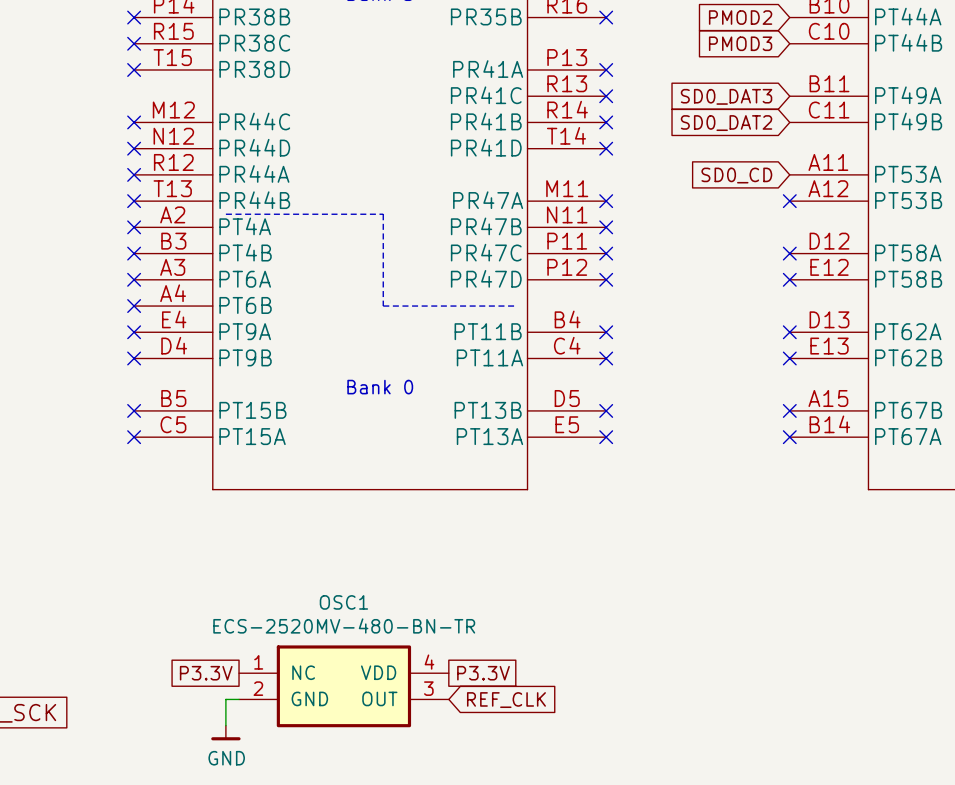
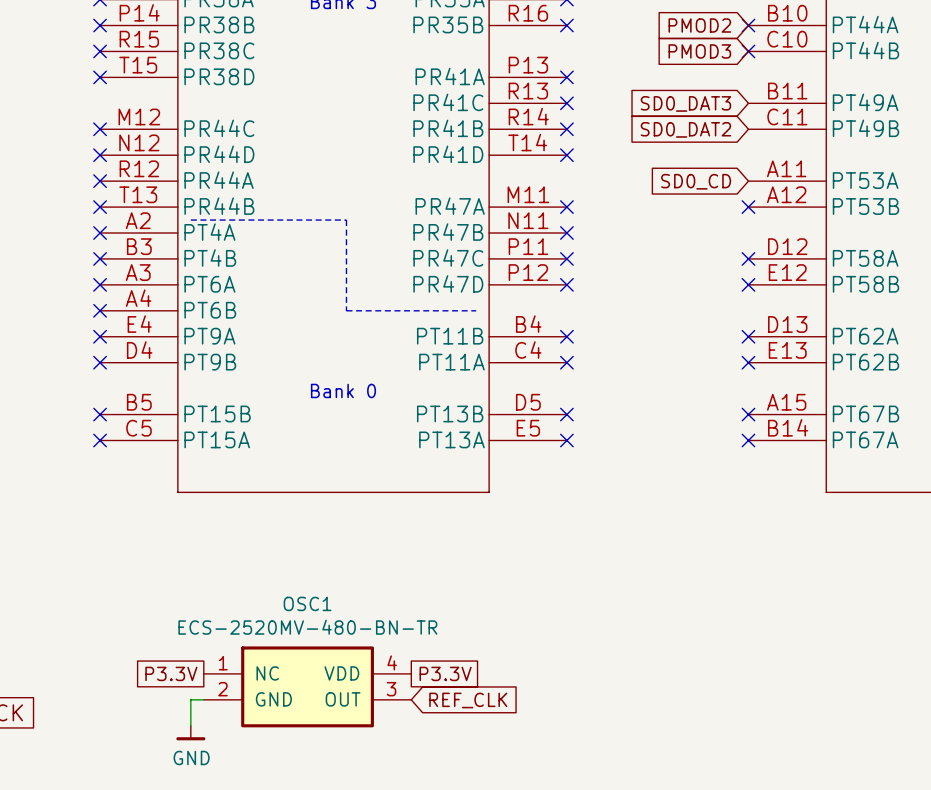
no-connect mark: none -> (748, 25)
no-connect mark: none -> (748, 51)

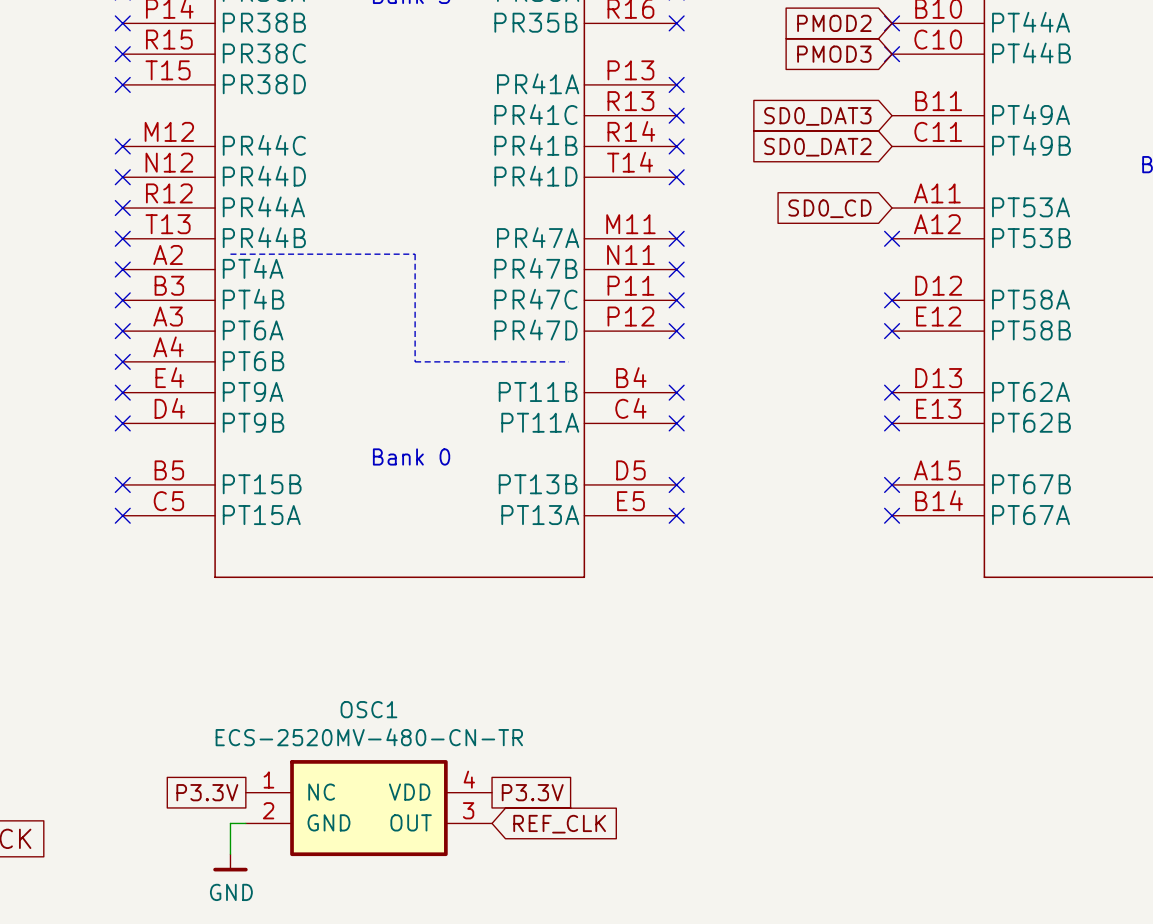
OSC1 value: ECS-2520MV-480-BN-TR (307, 627) -> ECS-2520MV-480-CN-TR (369, 737)

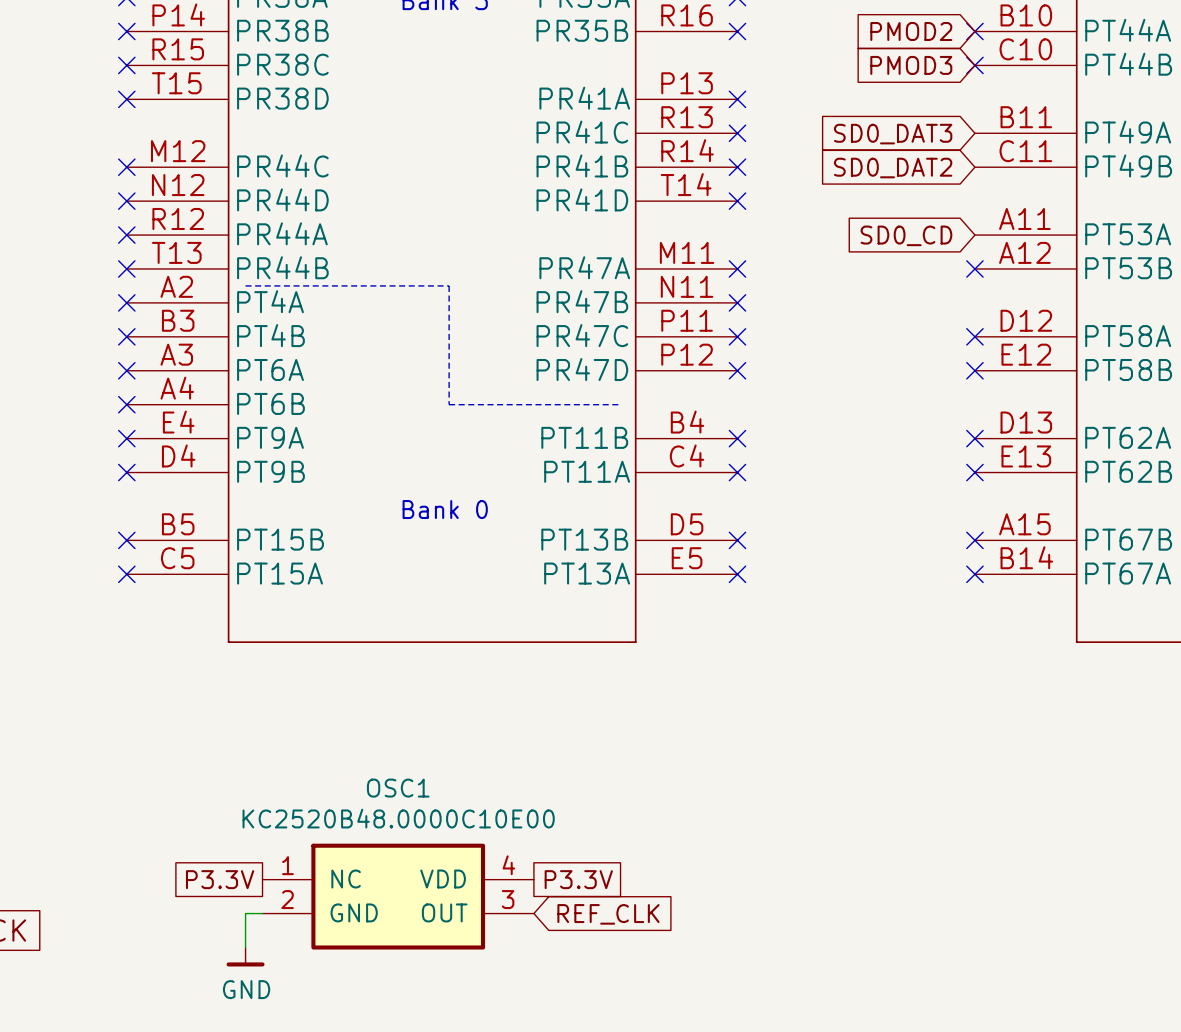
OSC1 value: ECS-2520MV-480-CN-TR (369, 737) -> KC2520B48.0000C10E00 (398, 818)

